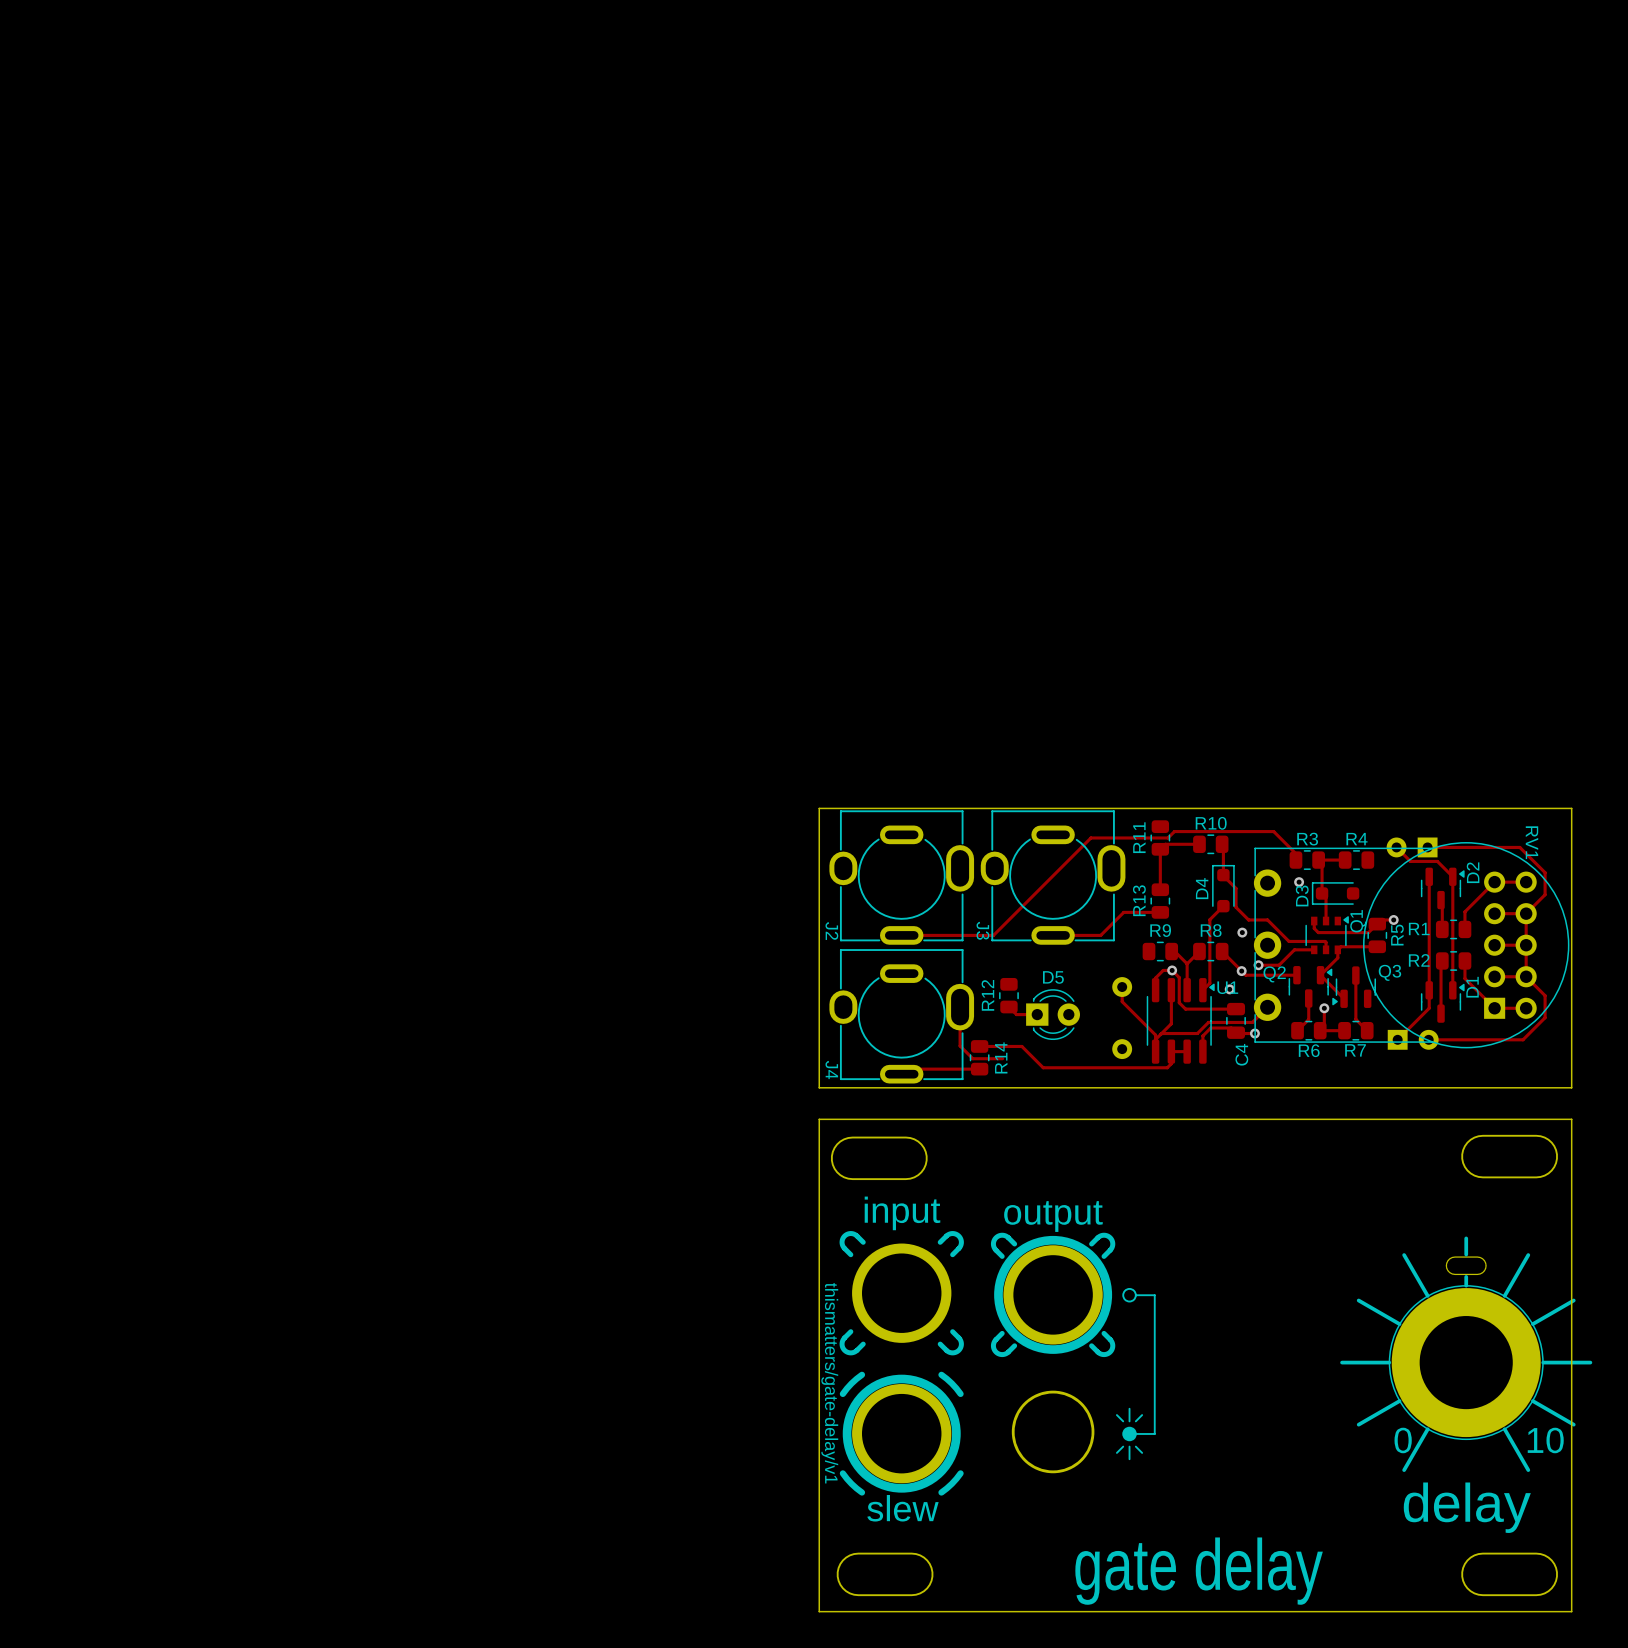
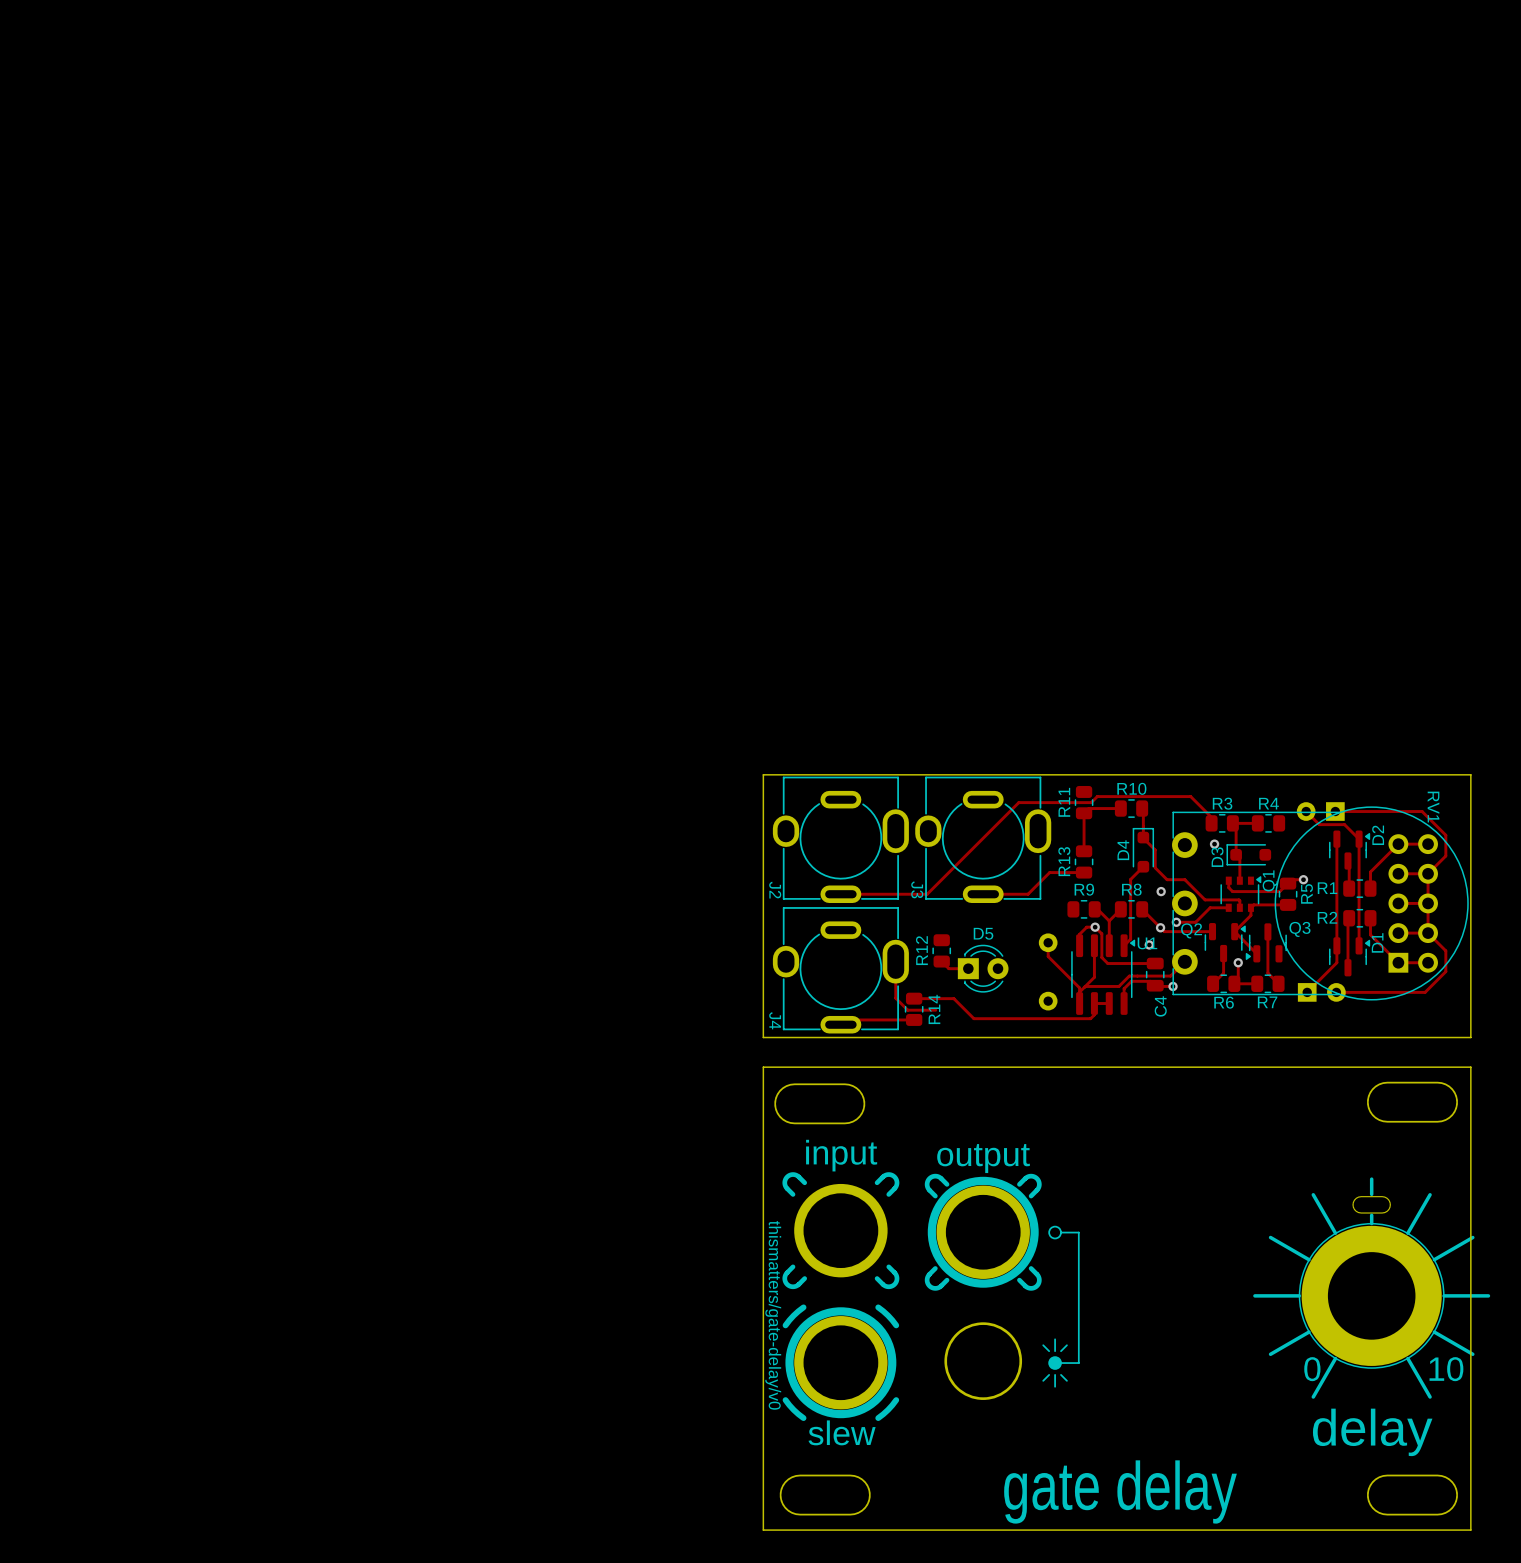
text: thismatters/gate-delay/v1 (829, 1383) -> thismatters/gate-delay/v0 (773, 1315)

